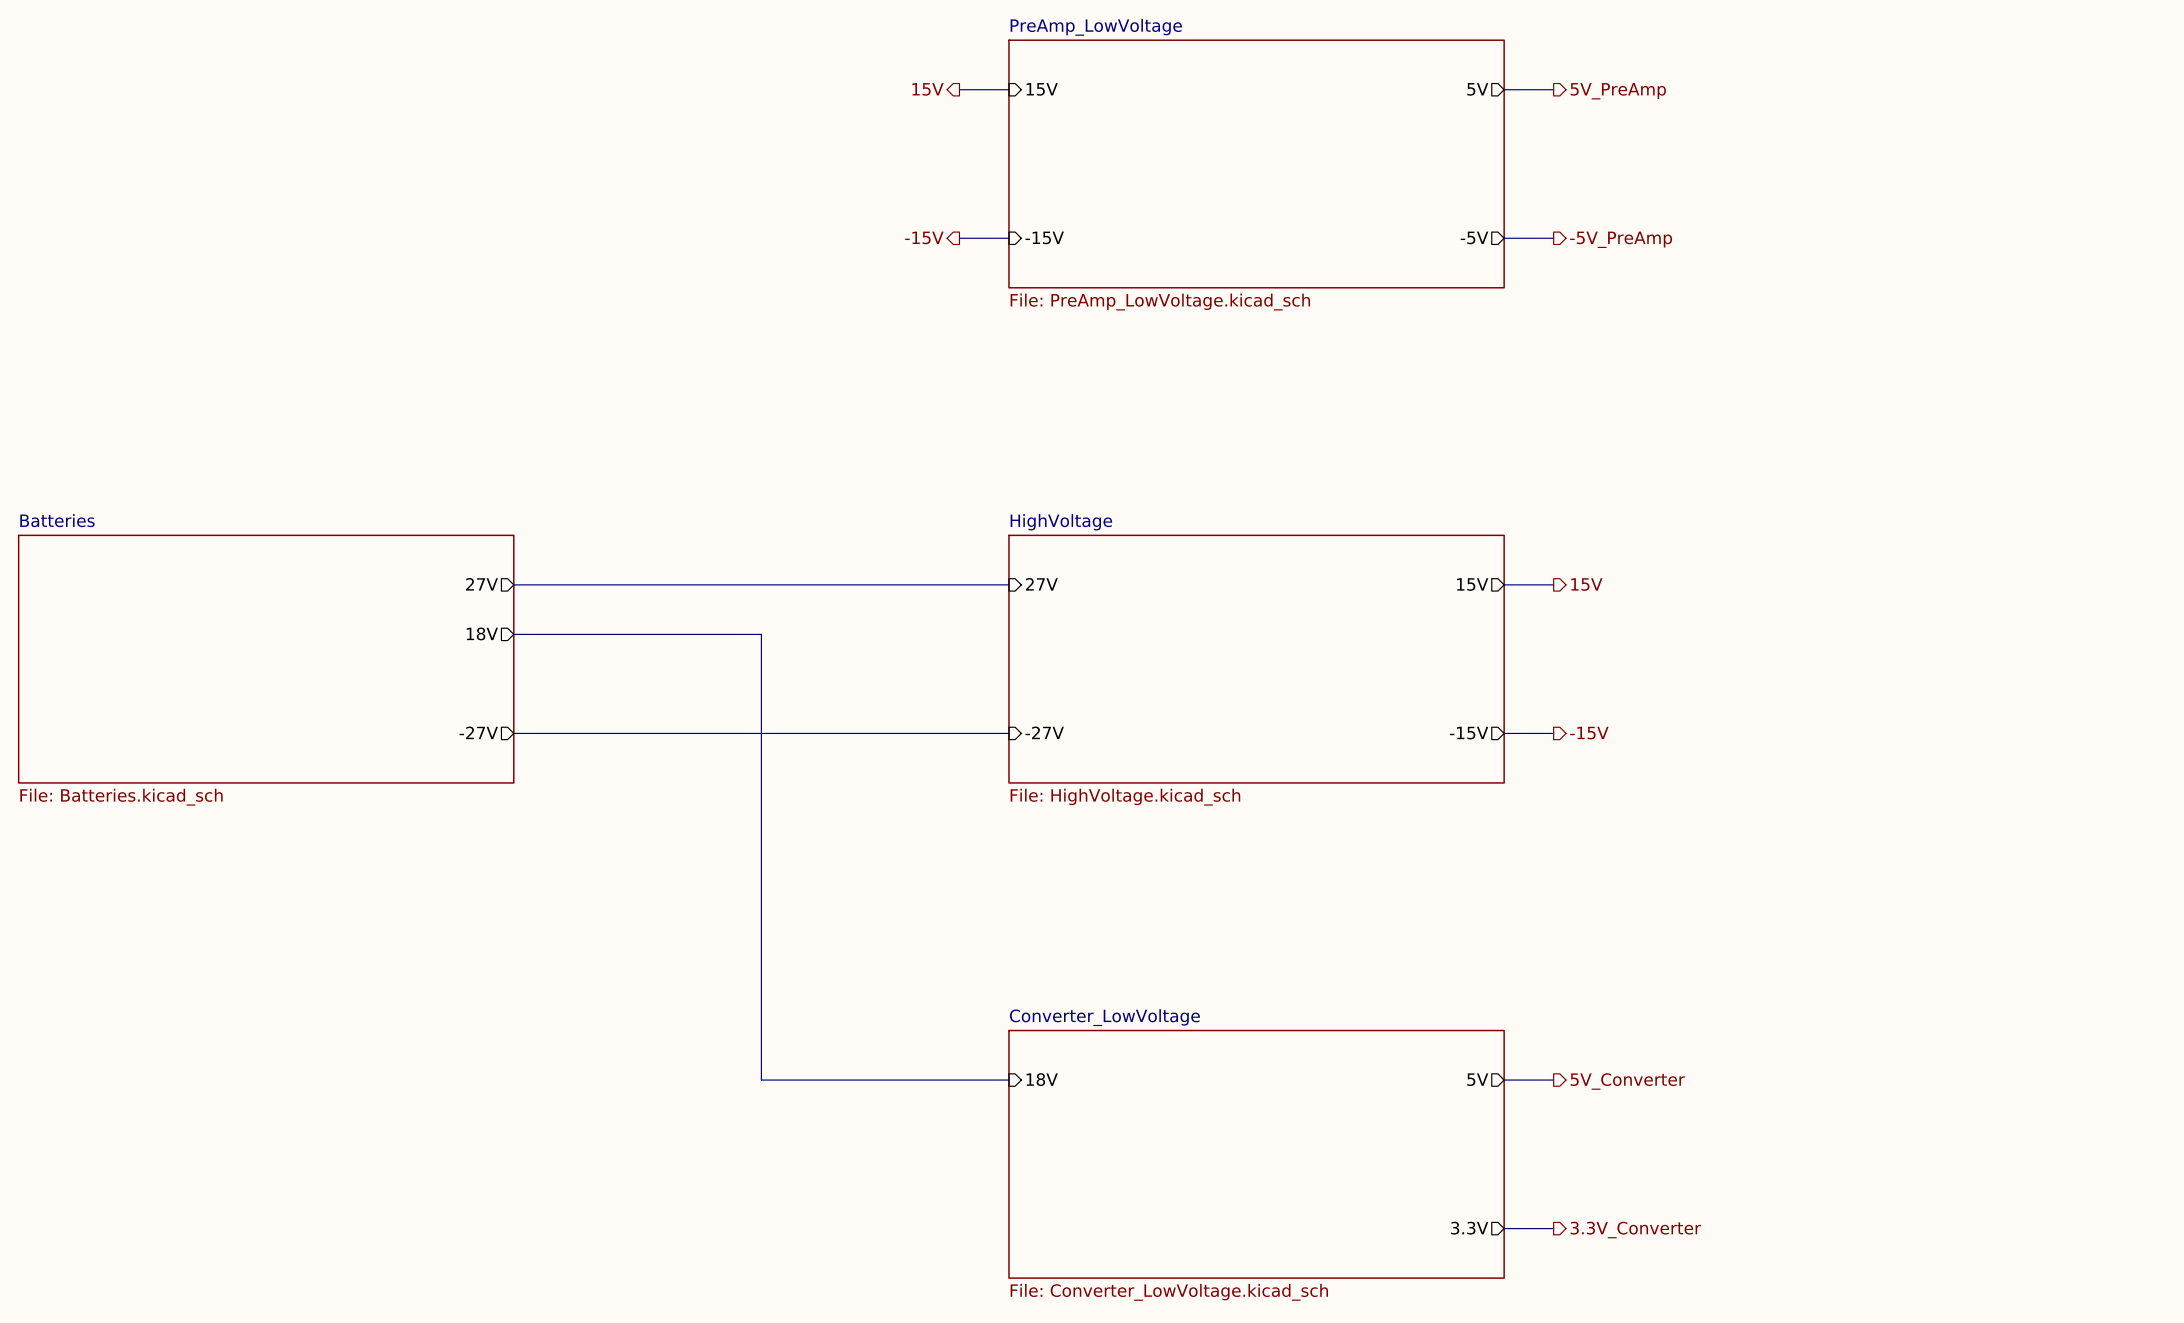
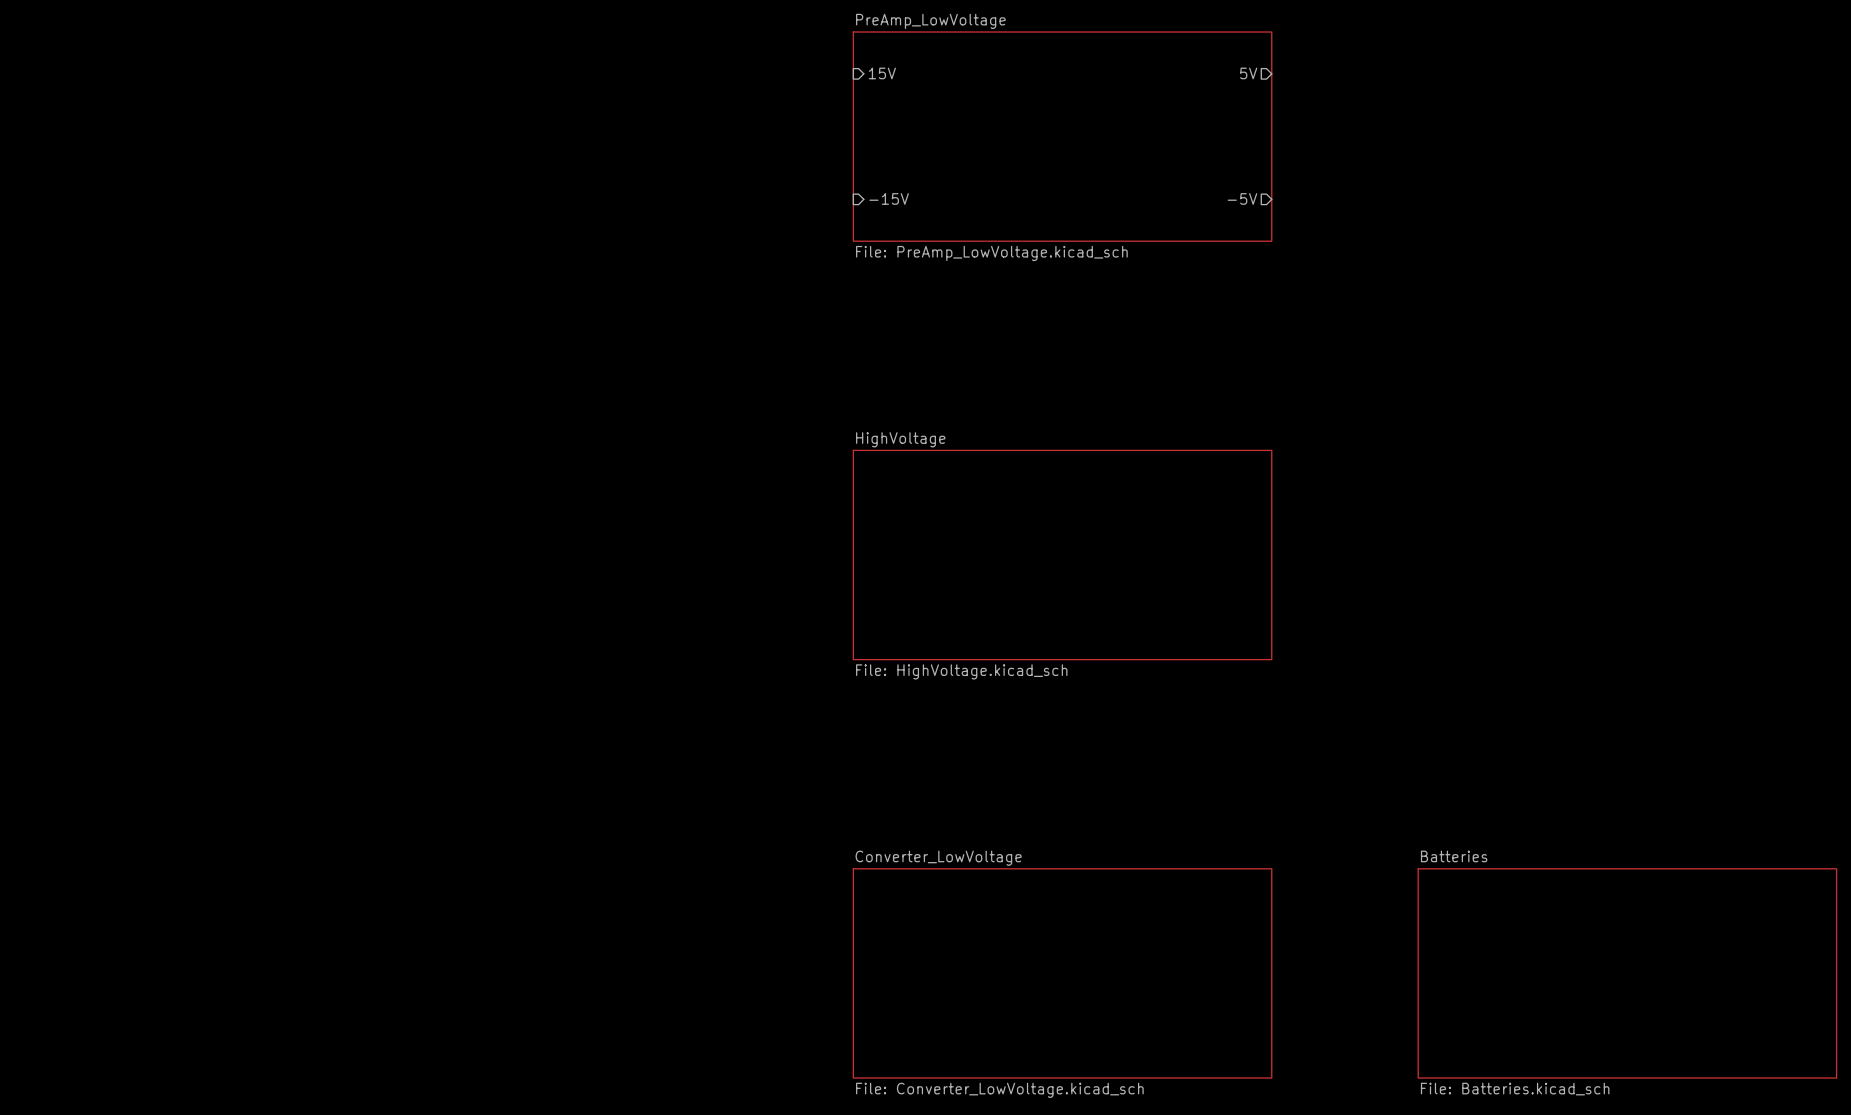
hierarchical label: 15V (927, 89) -> none
wire: (959, 89) (1008, 89) -> none
wire: (1504, 89) (1553, 89) -> none
hierarchical label: 5V_PreAmp (1618, 91) -> none
hierarchical label: -15V (924, 237) -> none
wire: (959, 238) (1008, 238) -> none
wire: (1504, 238) (1553, 238) -> none
hierarchical label: -5V_PreAmp (1621, 239) -> none
sheet pin: 27V (482, 584) -> none
wire: (513, 584) (1008, 584) -> none
sheet pin: 27V (1041, 584) -> none
sheet pin: 15V (1472, 584) -> none
wire: (1504, 584) (1553, 584) -> none
hierarchical label: 15V (1586, 584) -> none
sheet pin: 18V (482, 633) -> none
wire: (513, 634) (761, 634) (761, 1080) (1008, 1080) -> none
sheet Batteries: File: Batteries.kicad_sch (266, 659) -> none
sheet pin: -27V (478, 732) -> none
sheet pin: -27V (1044, 732) -> none
wire: (513, 733) (1008, 733) -> none
sheet pin: -15V (1469, 733) -> none
wire: (1504, 733) (1553, 733) -> none
hierarchical label: -15V (1589, 733) -> none
sheet pin: 18V (1042, 1079) -> none
sheet pin: 5V (1477, 1079) -> none
wire: (1504, 1080) (1553, 1080) -> none
hierarchical label: 5V_Converter (1627, 1081) -> none
sheet Batteries: none -> File: Batteries.kicad_sch (1627, 973)
sheet pin: 3.3V (1469, 1228) -> none
wire: (1504, 1228) (1553, 1228) -> none
hierarchical label: 3.3V_Converter (1635, 1230) -> none

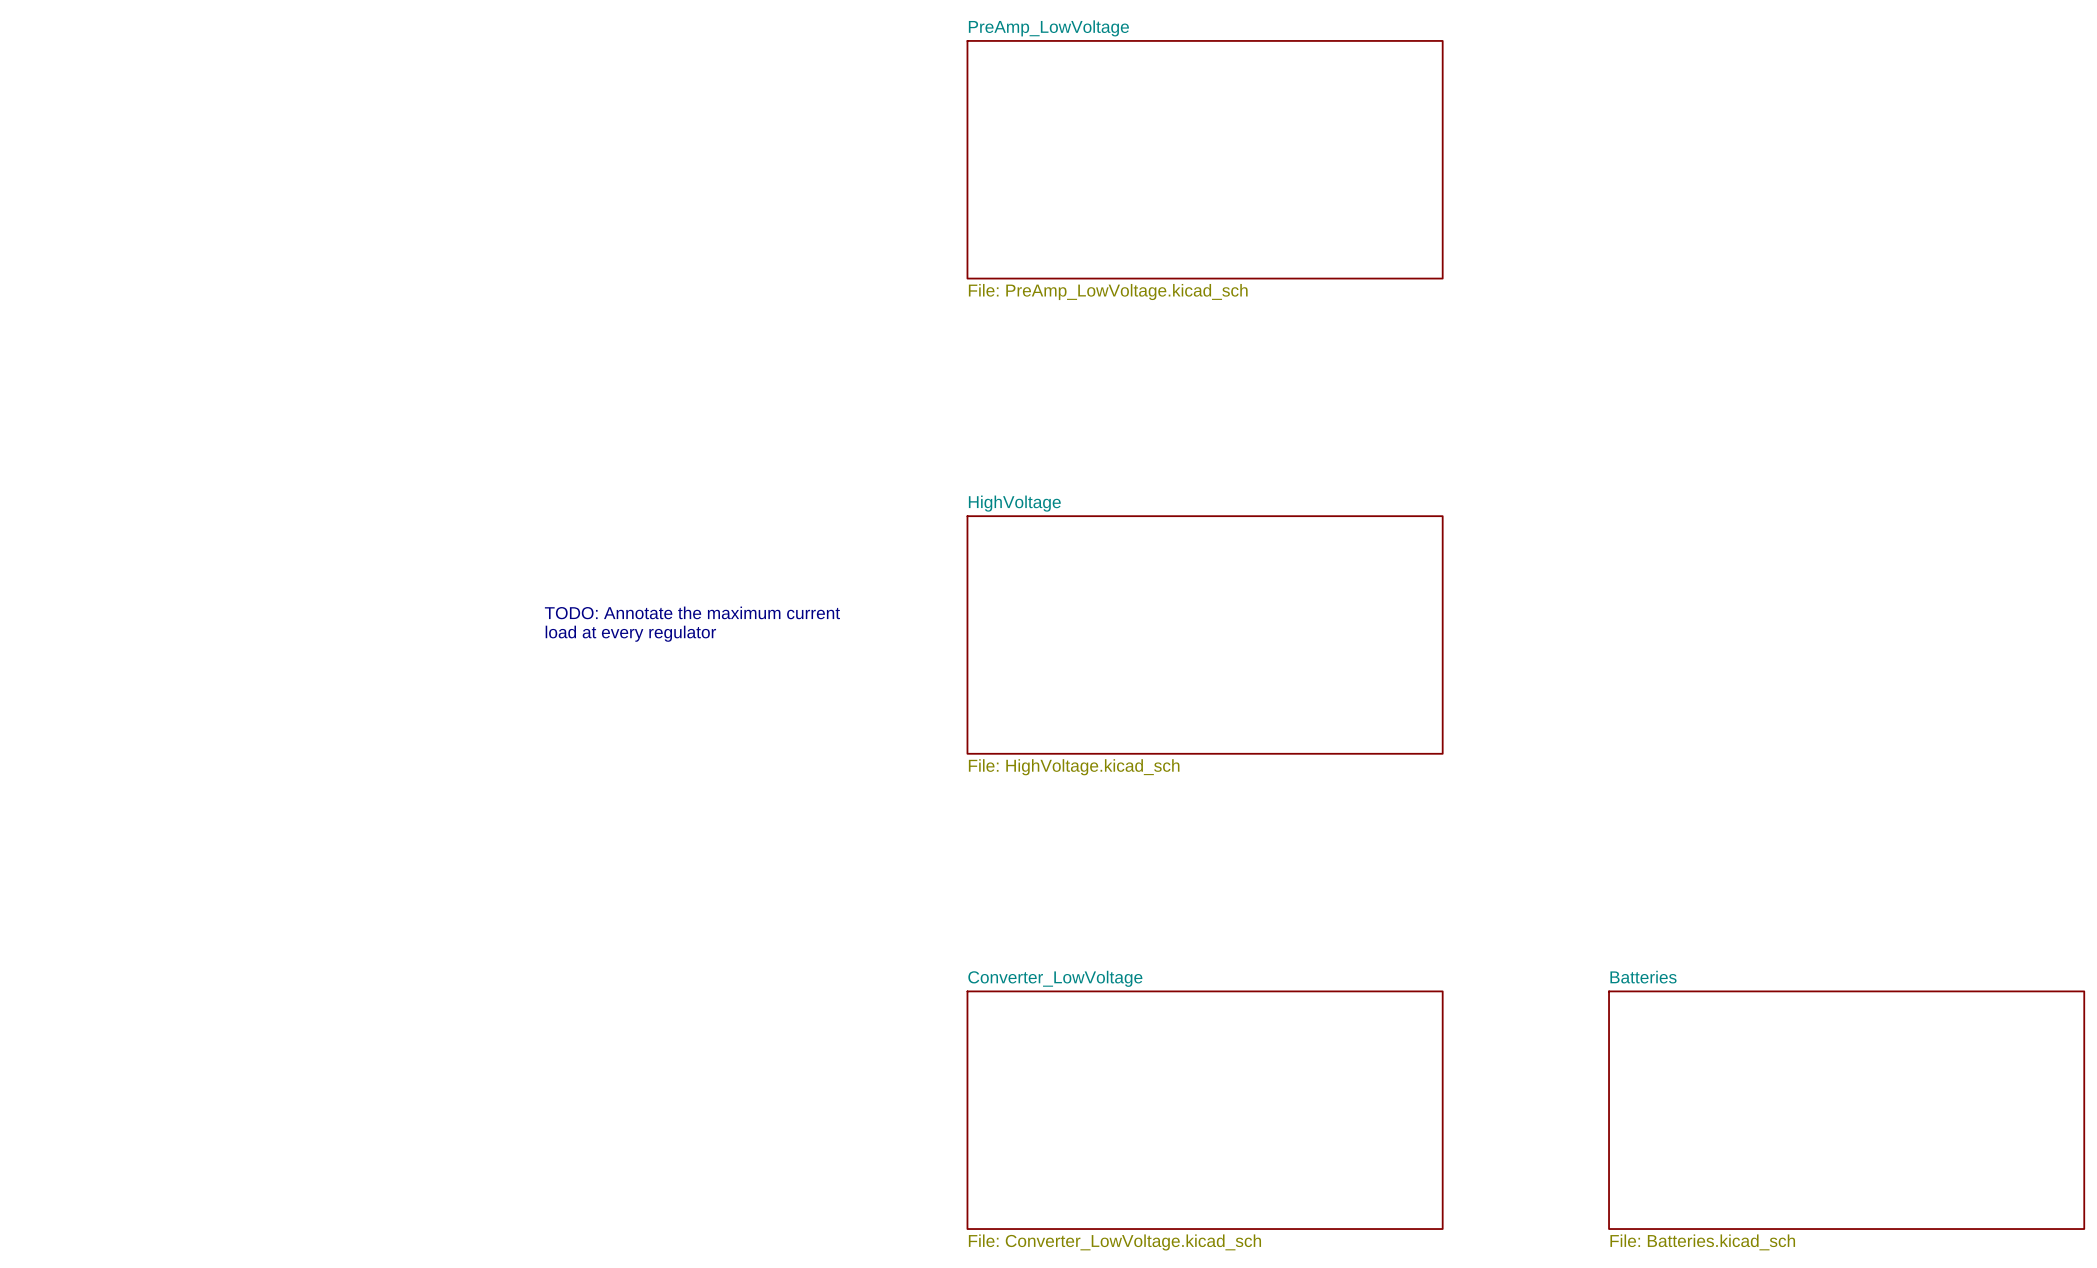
sheet pin: 15V (882, 73) -> none
sheet pin: 5V (1248, 73) -> none
sheet pin: -15V (889, 198) -> none
sheet pin: -5V (1242, 198) -> none
text: none -> TODO: Annotate the maximum current (692, 612)
text: none -> load at every regulator (630, 633)

